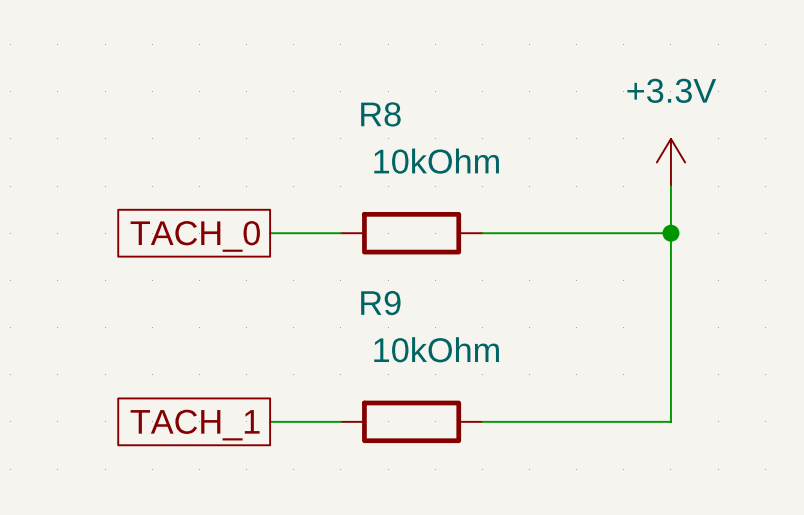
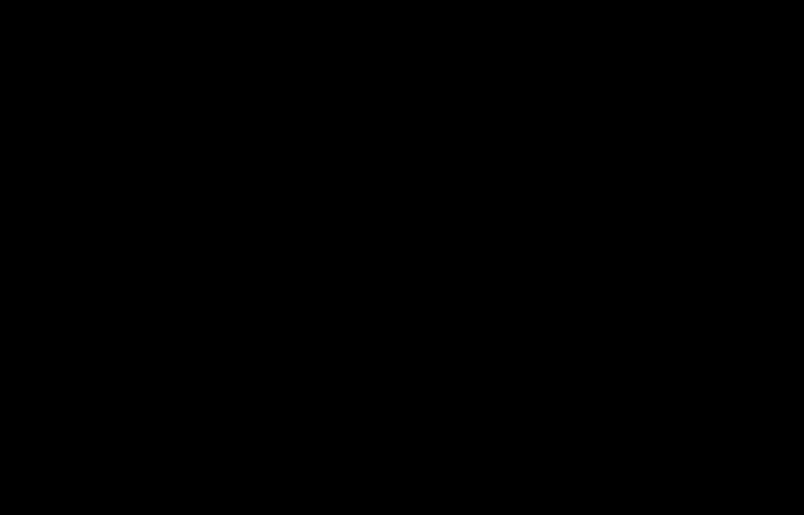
power symbol: +3.3V (670, 162) -> none
wire: (670, 186) (670, 421) (482, 421) -> none
wire: (270, 233) (340, 233) -> none
R8: 10kOhm (411, 233) -> none
wire: (482, 233) (670, 233) -> none
junction: (670, 233) -> none
global label: TACH_0 (195, 236) -> none
wire: (270, 421) (340, 421) -> none
R9: 10kOhm (411, 421) -> none
global label: TACH_1 (195, 425) -> none

